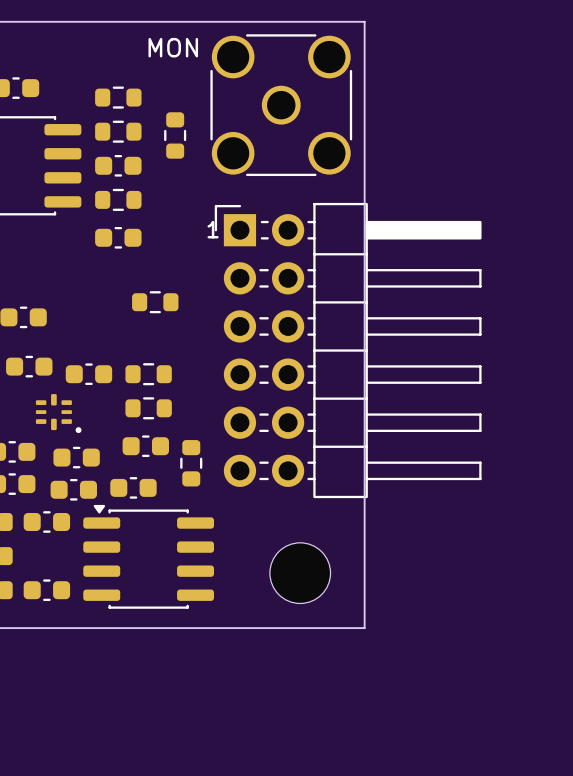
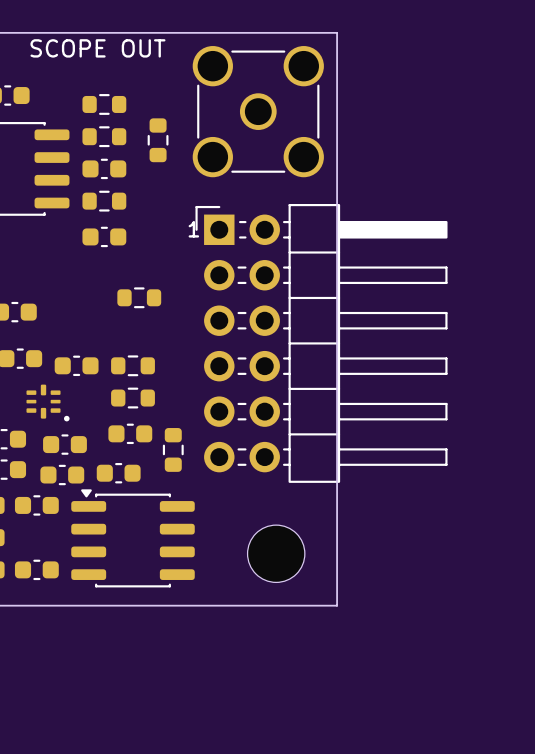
part footprint: [210, 34, 353, 177] -> [192, 46, 324, 178]
text: none -> SCOPE OUT (97, 48)
text: MON (173, 47) -> none

